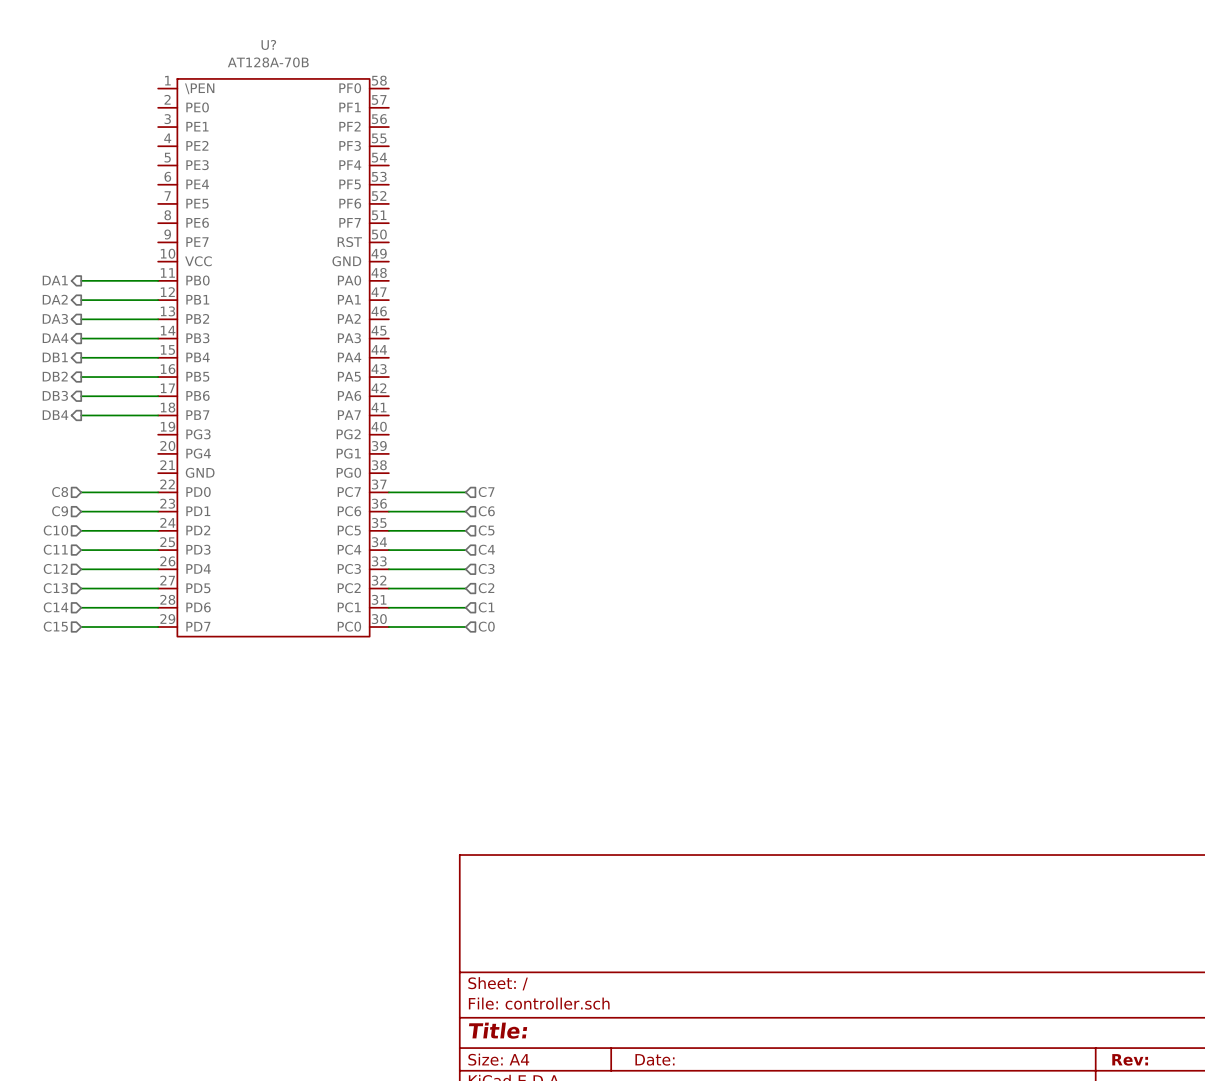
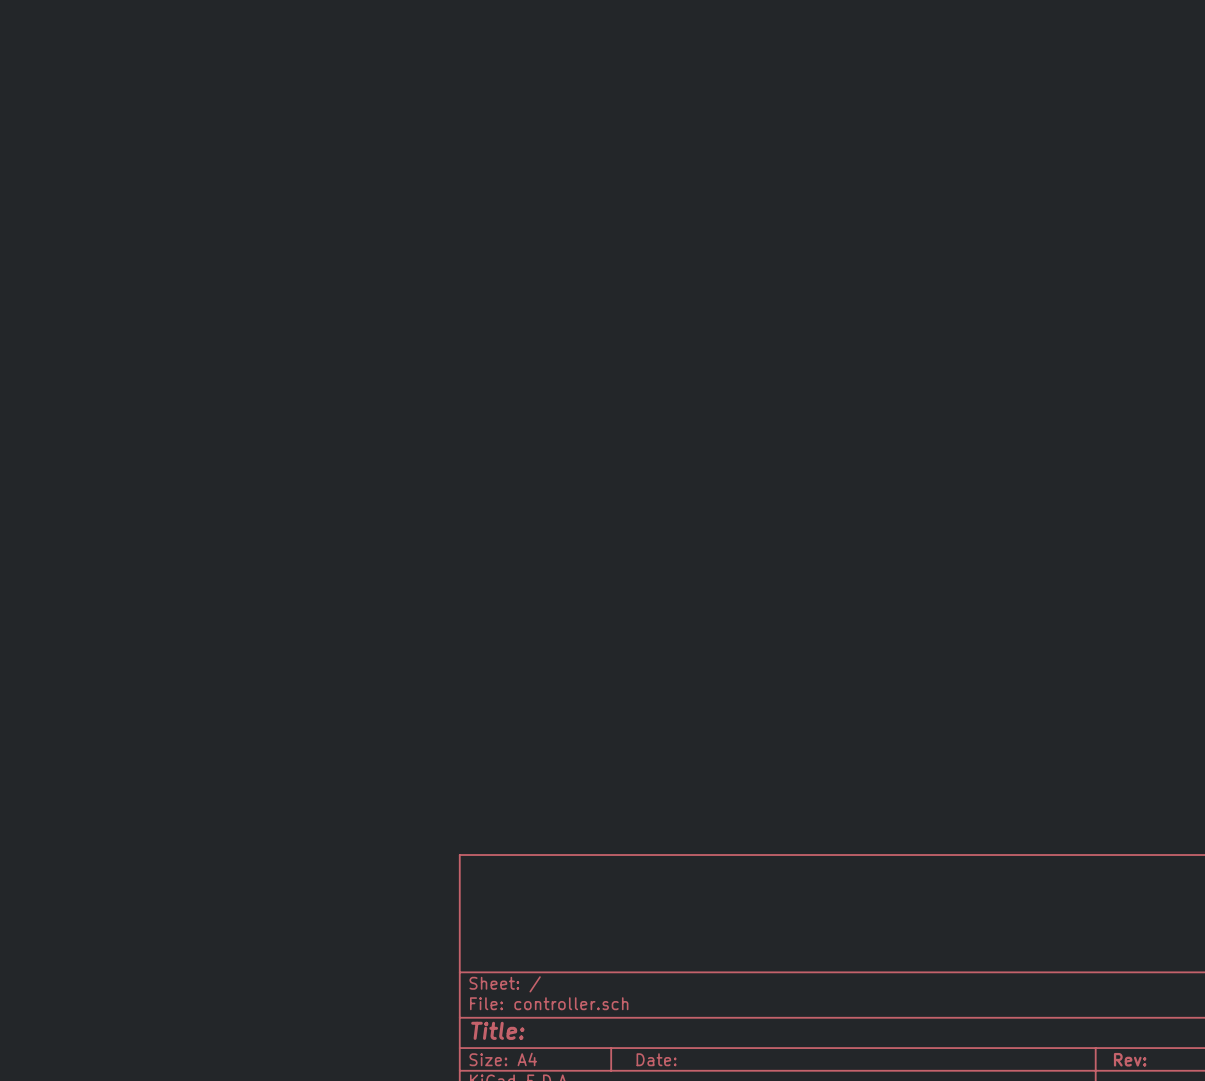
hierarchical label: DA1 (55, 280) -> none
wire: (81, 280) (158, 280) -> none
hierarchical label: DA2 (55, 299) -> none
wire: (81, 300) (158, 300) -> none
hierarchical label: DA3 (55, 318) -> none
wire: (81, 319) (158, 319) -> none
hierarchical label: DA4 (55, 338) -> none
wire: (81, 338) (158, 338) -> none
hierarchical label: DB1 (55, 357) -> none
wire: (81, 357) (158, 357) -> none
U?: AT128A-70B (273, 357) -> none
hierarchical label: DB2 (55, 376) -> none
wire: (81, 377) (158, 377) -> none
hierarchical label: DB3 (55, 395) -> none
wire: (81, 396) (158, 396) -> none
hierarchical label: DB4 (55, 415) -> none
wire: (81, 415) (158, 415) -> none
hierarchical label: C8 (60, 492) -> none
wire: (81, 492) (158, 492) -> none
wire: (388, 492) (465, 492) -> none
hierarchical label: C7 (486, 492) -> none
hierarchical label: C9 (60, 511) -> none
wire: (81, 511) (158, 511) -> none
wire: (388, 511) (465, 511) -> none
hierarchical label: C6 (486, 511) -> none
hierarchical label: C10 (55, 530) -> none
wire: (81, 530) (158, 530) -> none
wire: (388, 530) (465, 530) -> none
hierarchical label: C5 (486, 530) -> none
hierarchical label: C11 (55, 549) -> none
hierarchical label: C4 (486, 549) -> none
wire: (81, 550) (158, 550) -> none
wire: (388, 550) (465, 550) -> none
hierarchical label: C12 (55, 568) -> none
hierarchical label: C3 (486, 568) -> none
wire: (81, 569) (158, 569) -> none
wire: (388, 569) (465, 569) -> none
hierarchical label: C13 (55, 588) -> none
wire: (81, 588) (158, 588) -> none
wire: (388, 588) (465, 588) -> none
hierarchical label: C2 (486, 588) -> none
hierarchical label: C14 (56, 607) -> none
wire: (81, 607) (158, 607) -> none
wire: (388, 607) (465, 607) -> none
hierarchical label: C1 (486, 607) -> none
hierarchical label: C15 (55, 626) -> none
hierarchical label: C0 (486, 626) -> none
wire: (81, 627) (158, 627) -> none
wire: (388, 627) (465, 627) -> none

